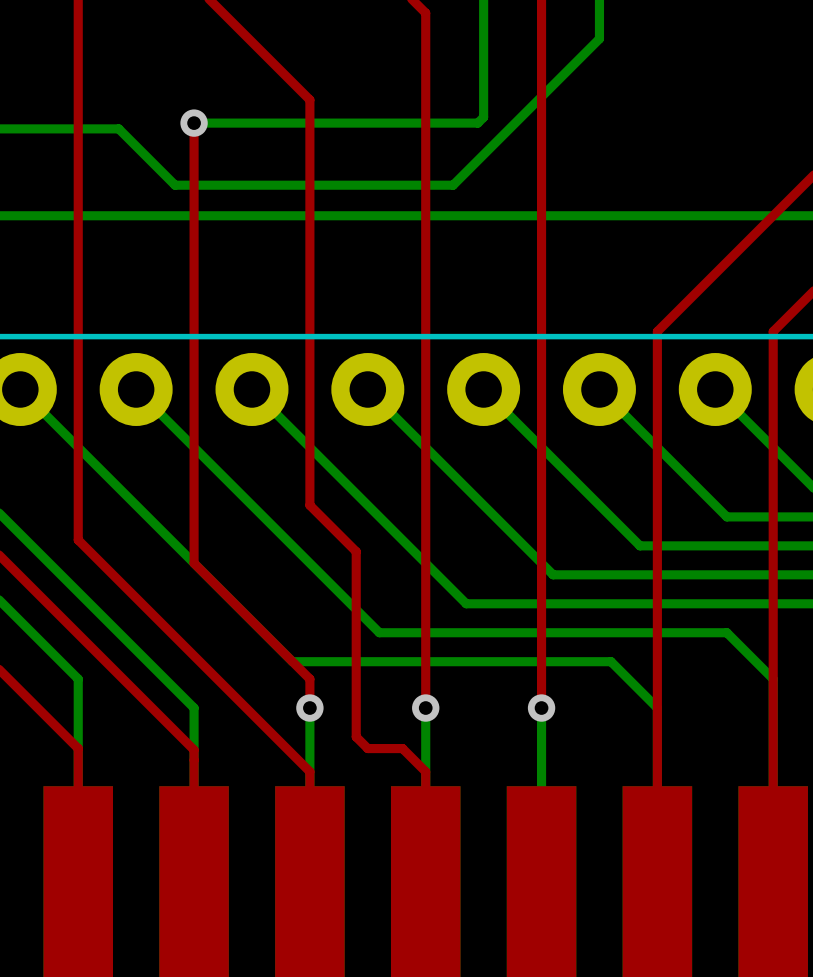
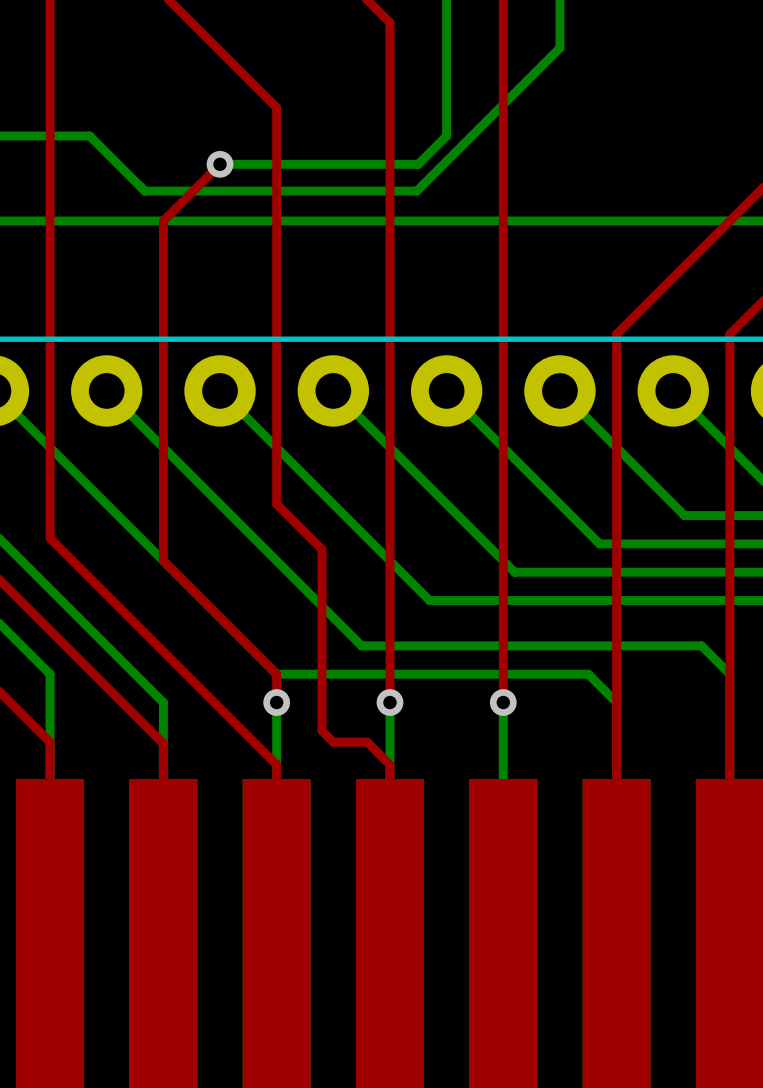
bottom track: (483, 117) (477, 123) (194, 123) -> (446, 124) (446, 135) (418, 164) (220, 164)
top track: (194, 123) (194, 215) -> (220, 164) (163, 220)
via position: (194, 123) -> (220, 164)
bottom track: (379, 632) (726, 632) (744, 650) -> (344, 628) (361, 645) (701, 645)
bottom track: (292, 661) (611, 661) (628, 679) -> (259, 657) (276, 674) (588, 674)

